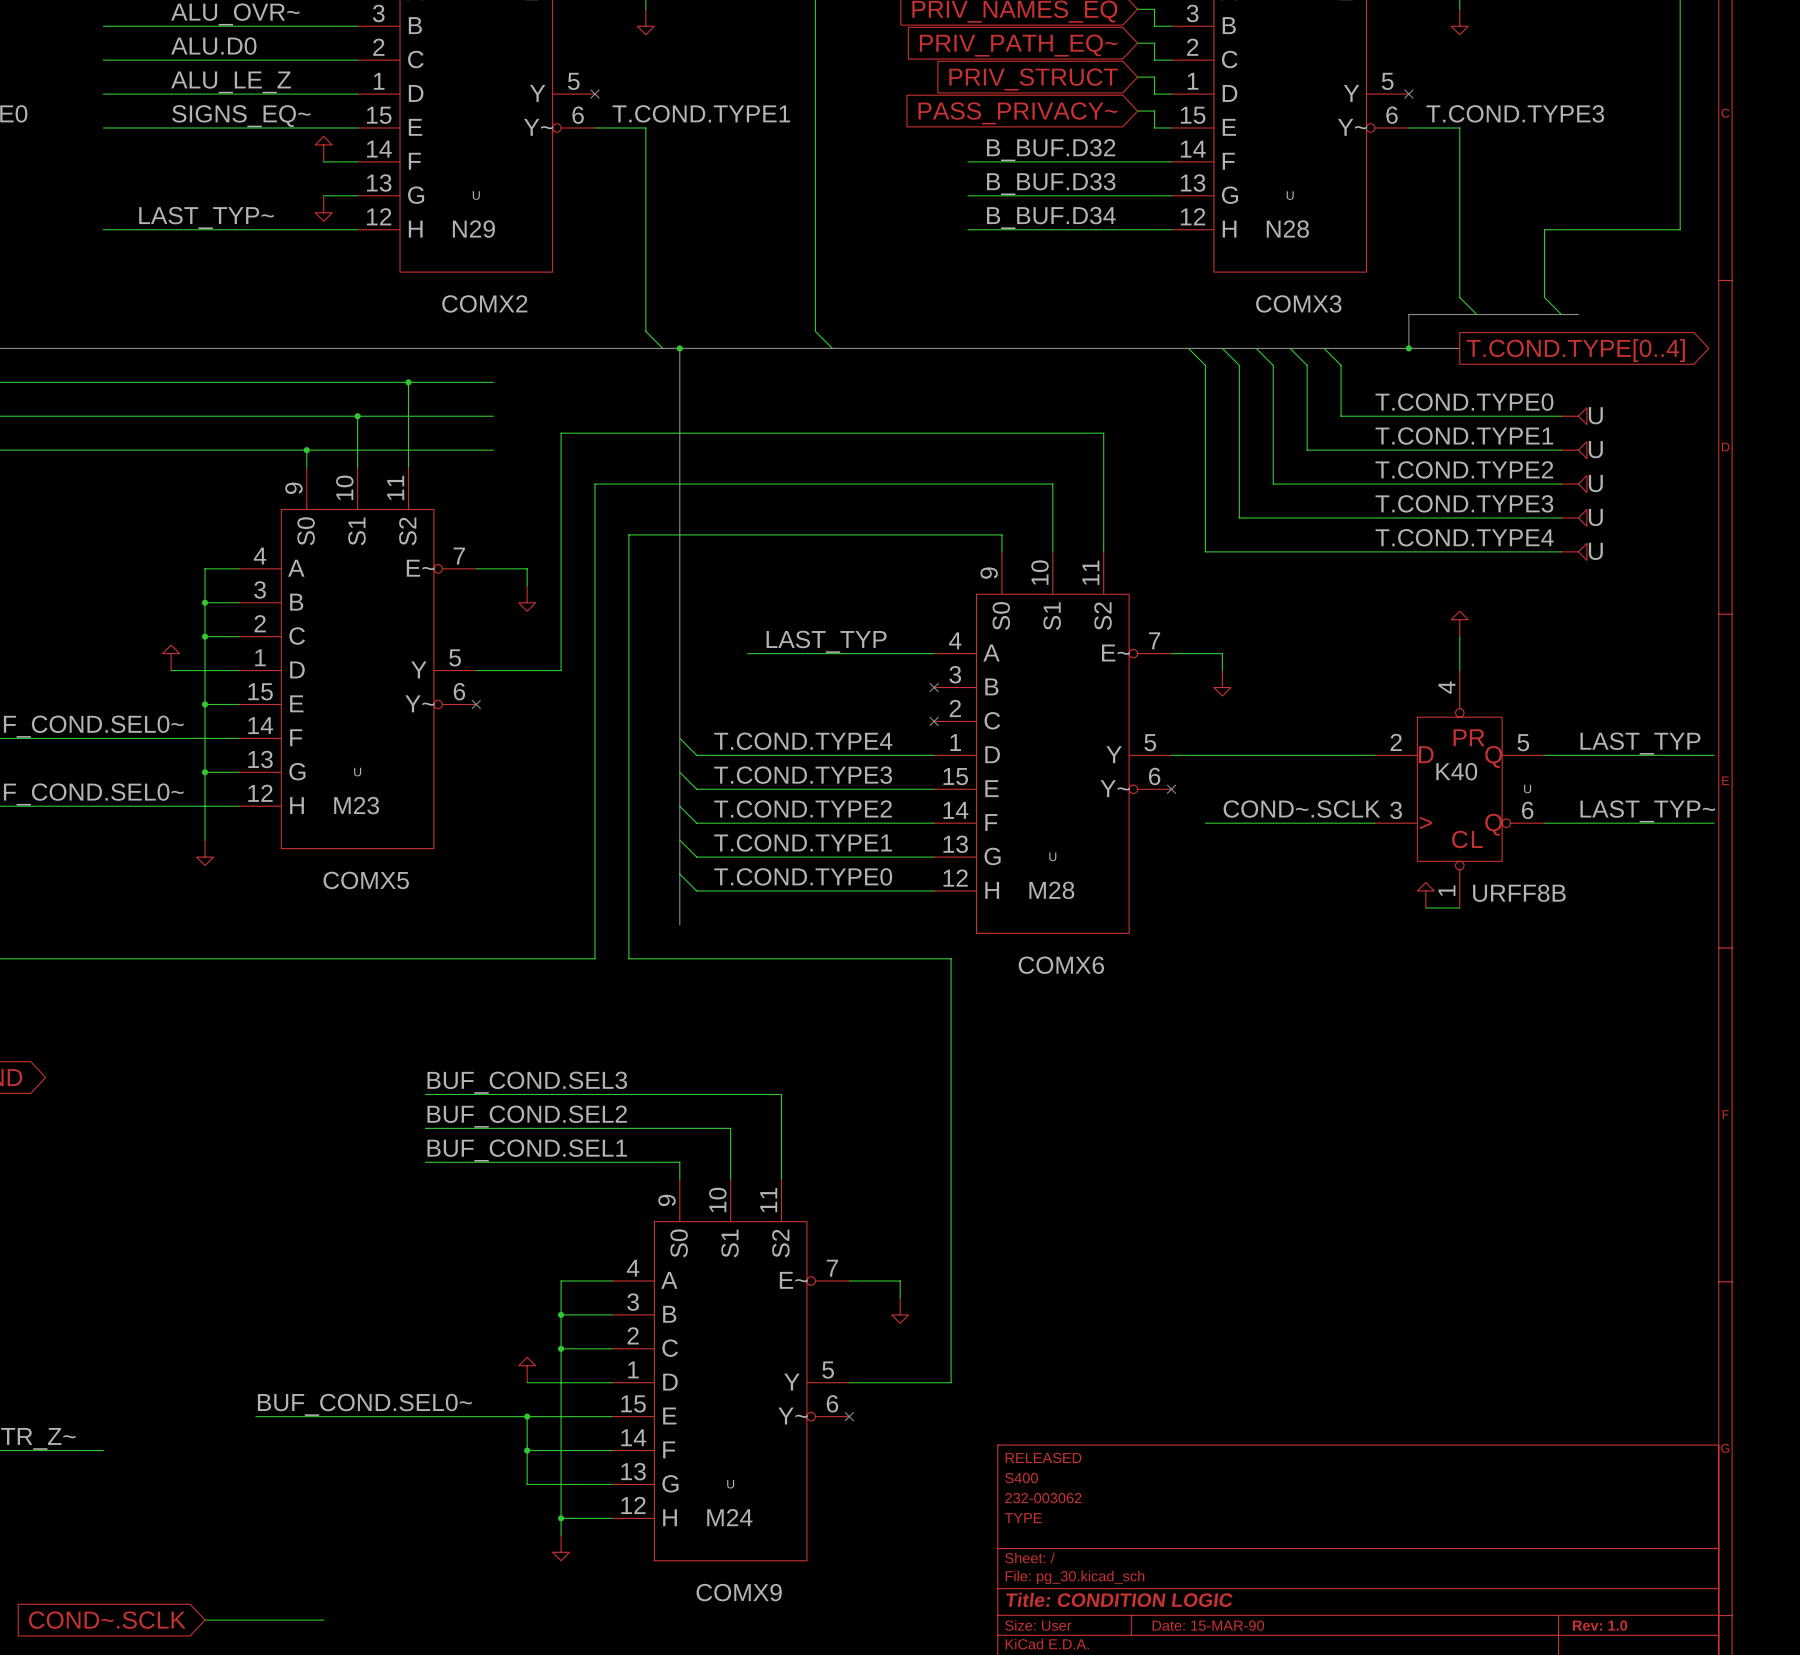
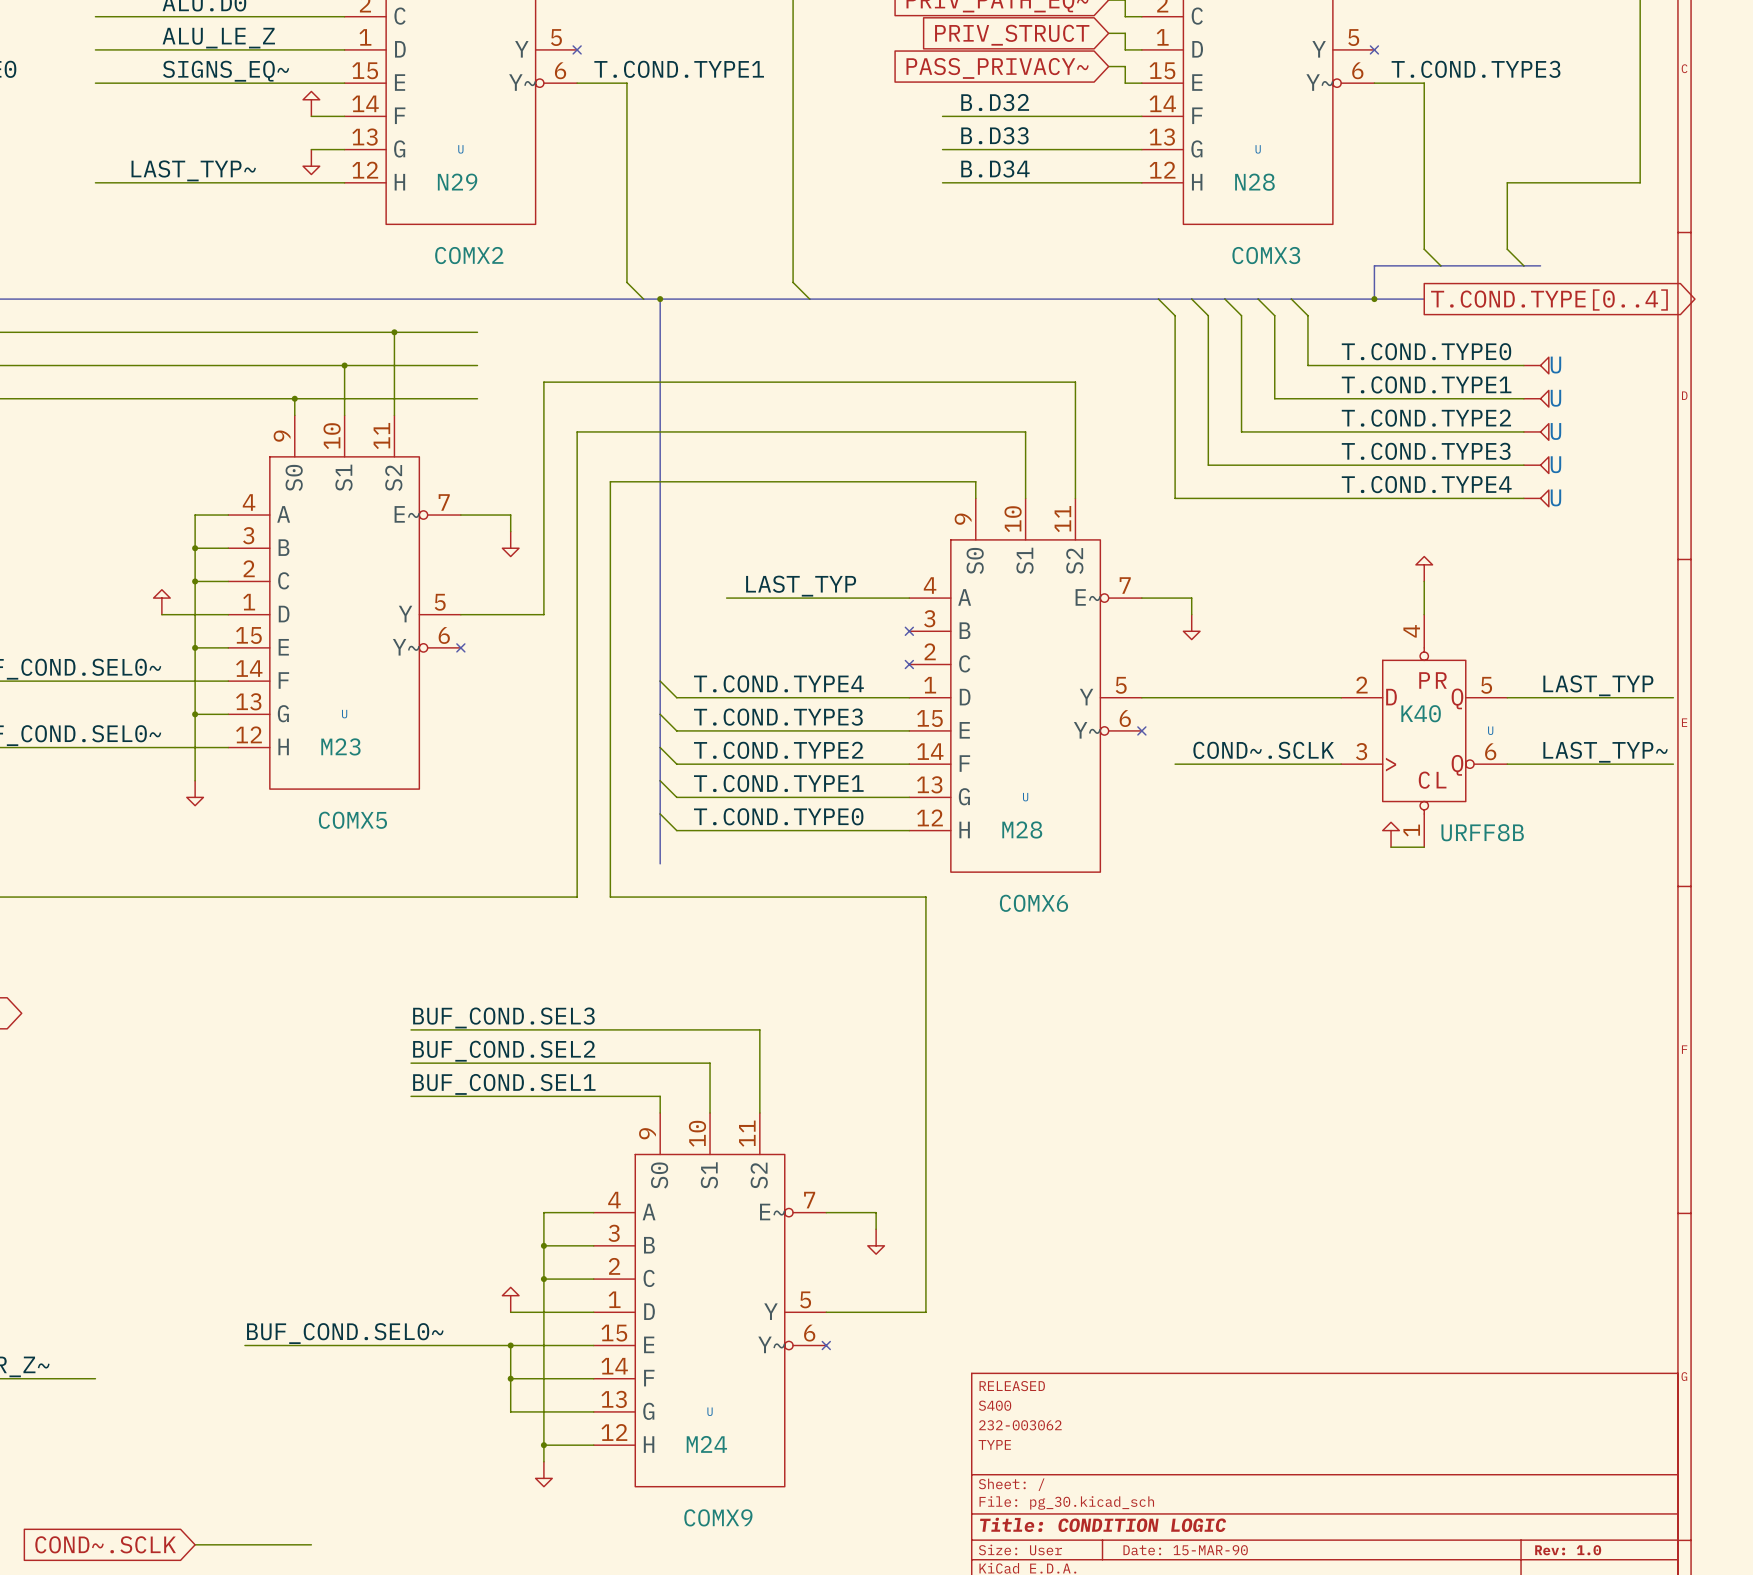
label: B_BUF.D32 (1051, 150) -> B.D32 (995, 102)
label: B_BUF.D33 (1051, 184) -> B.D33 (994, 135)
label: B_BUF.D34 (1051, 217) -> B.D34 (995, 168)

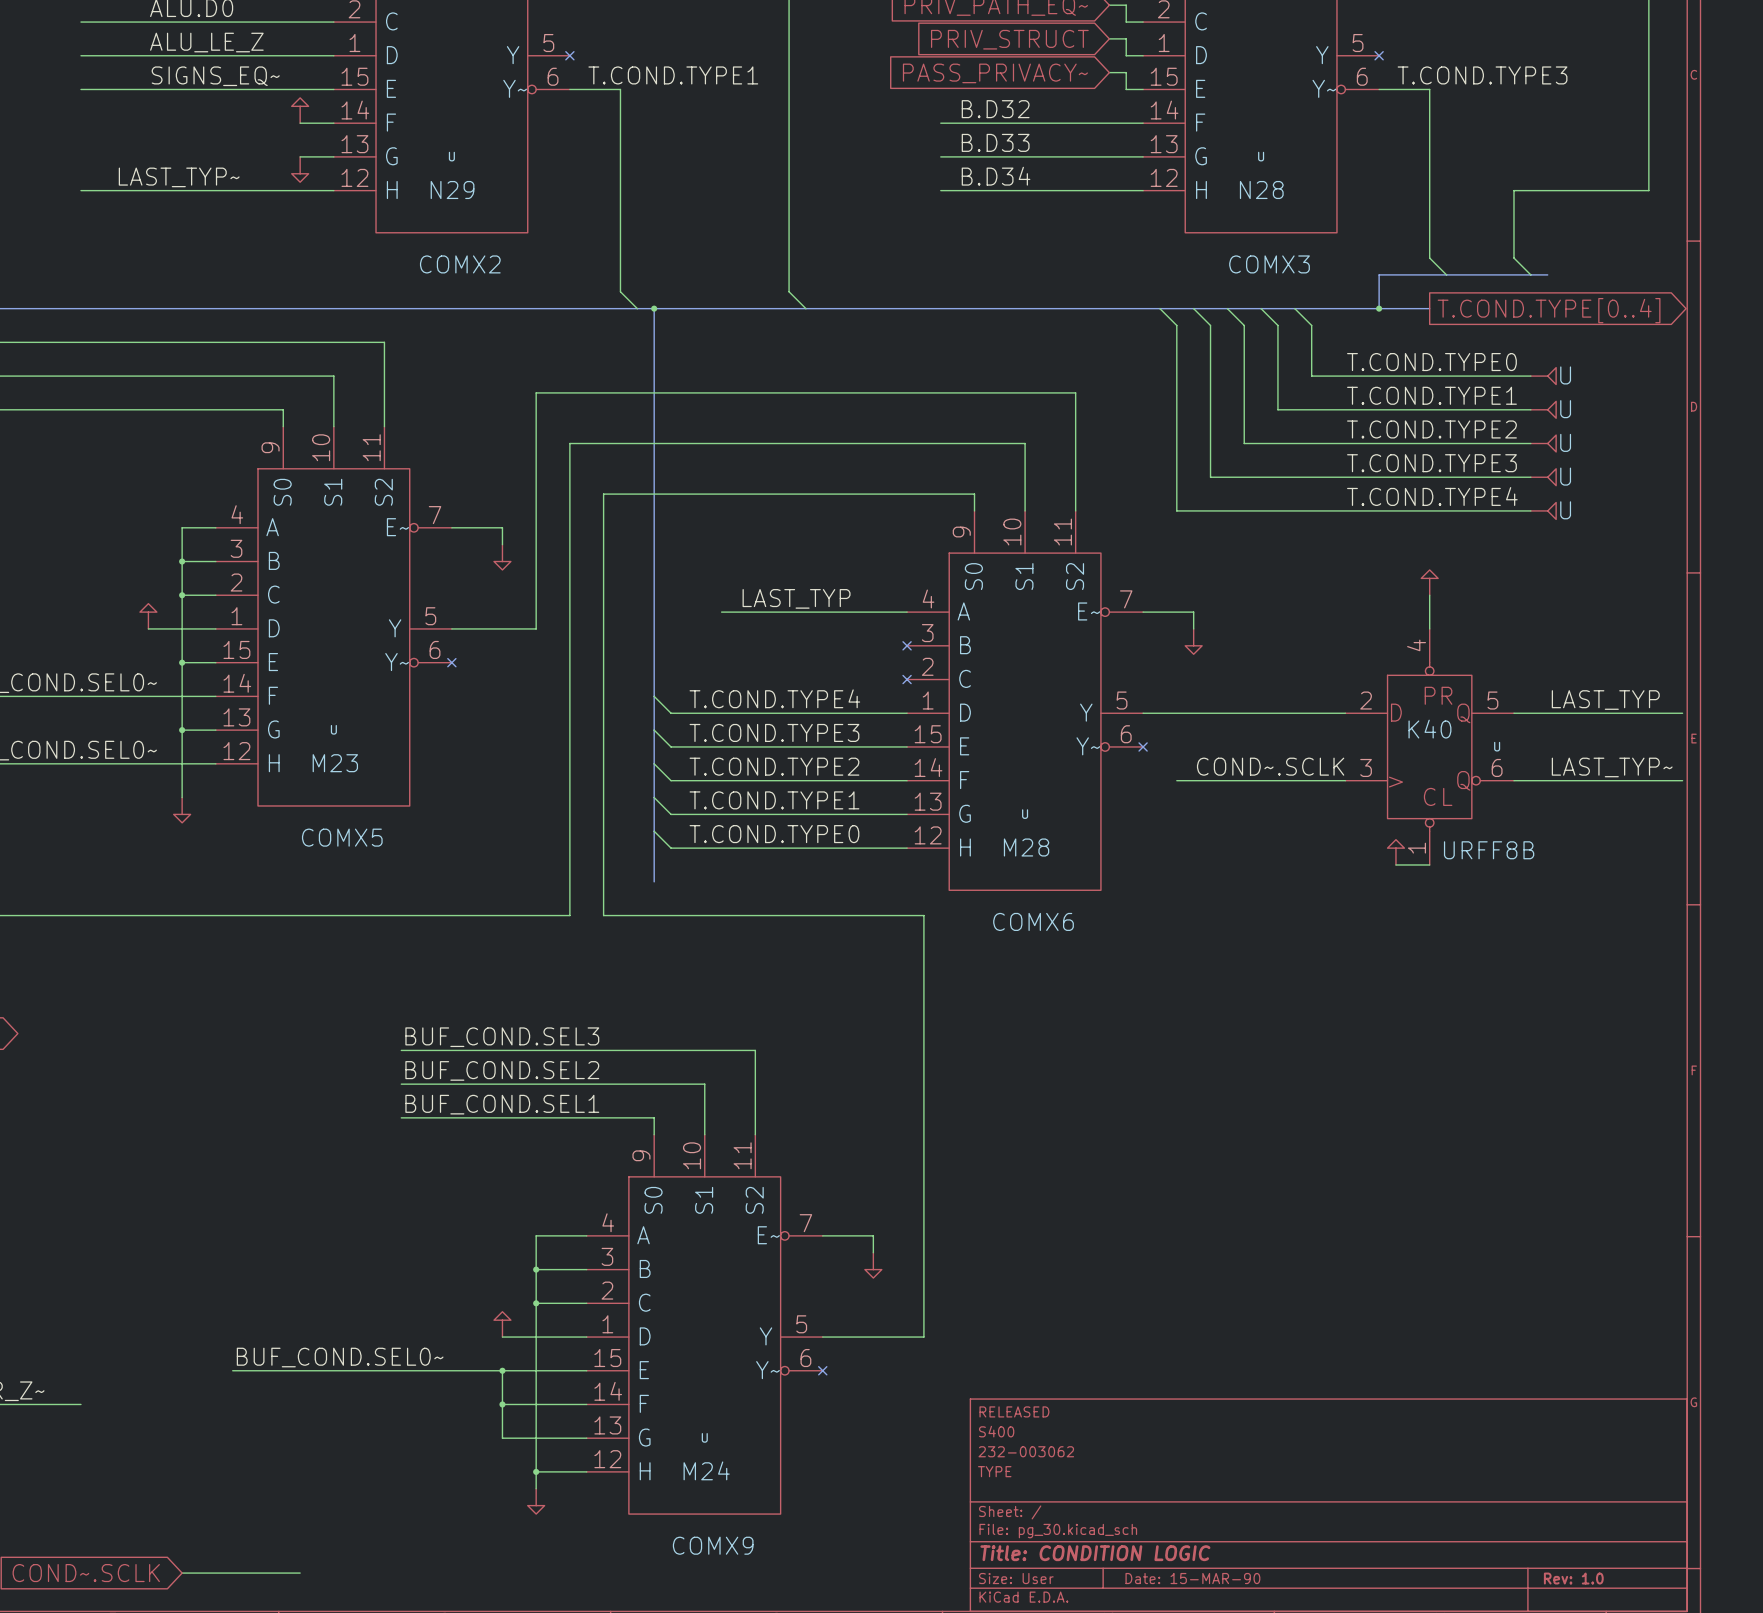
wire: (394, 332) (477, 332) -> none
junction: (394, 332) -> none
wire: (344, 365) (477, 365) -> none
junction: (344, 365) -> none
wire: (294, 398) (477, 398) -> none
junction: (294, 398) -> none

